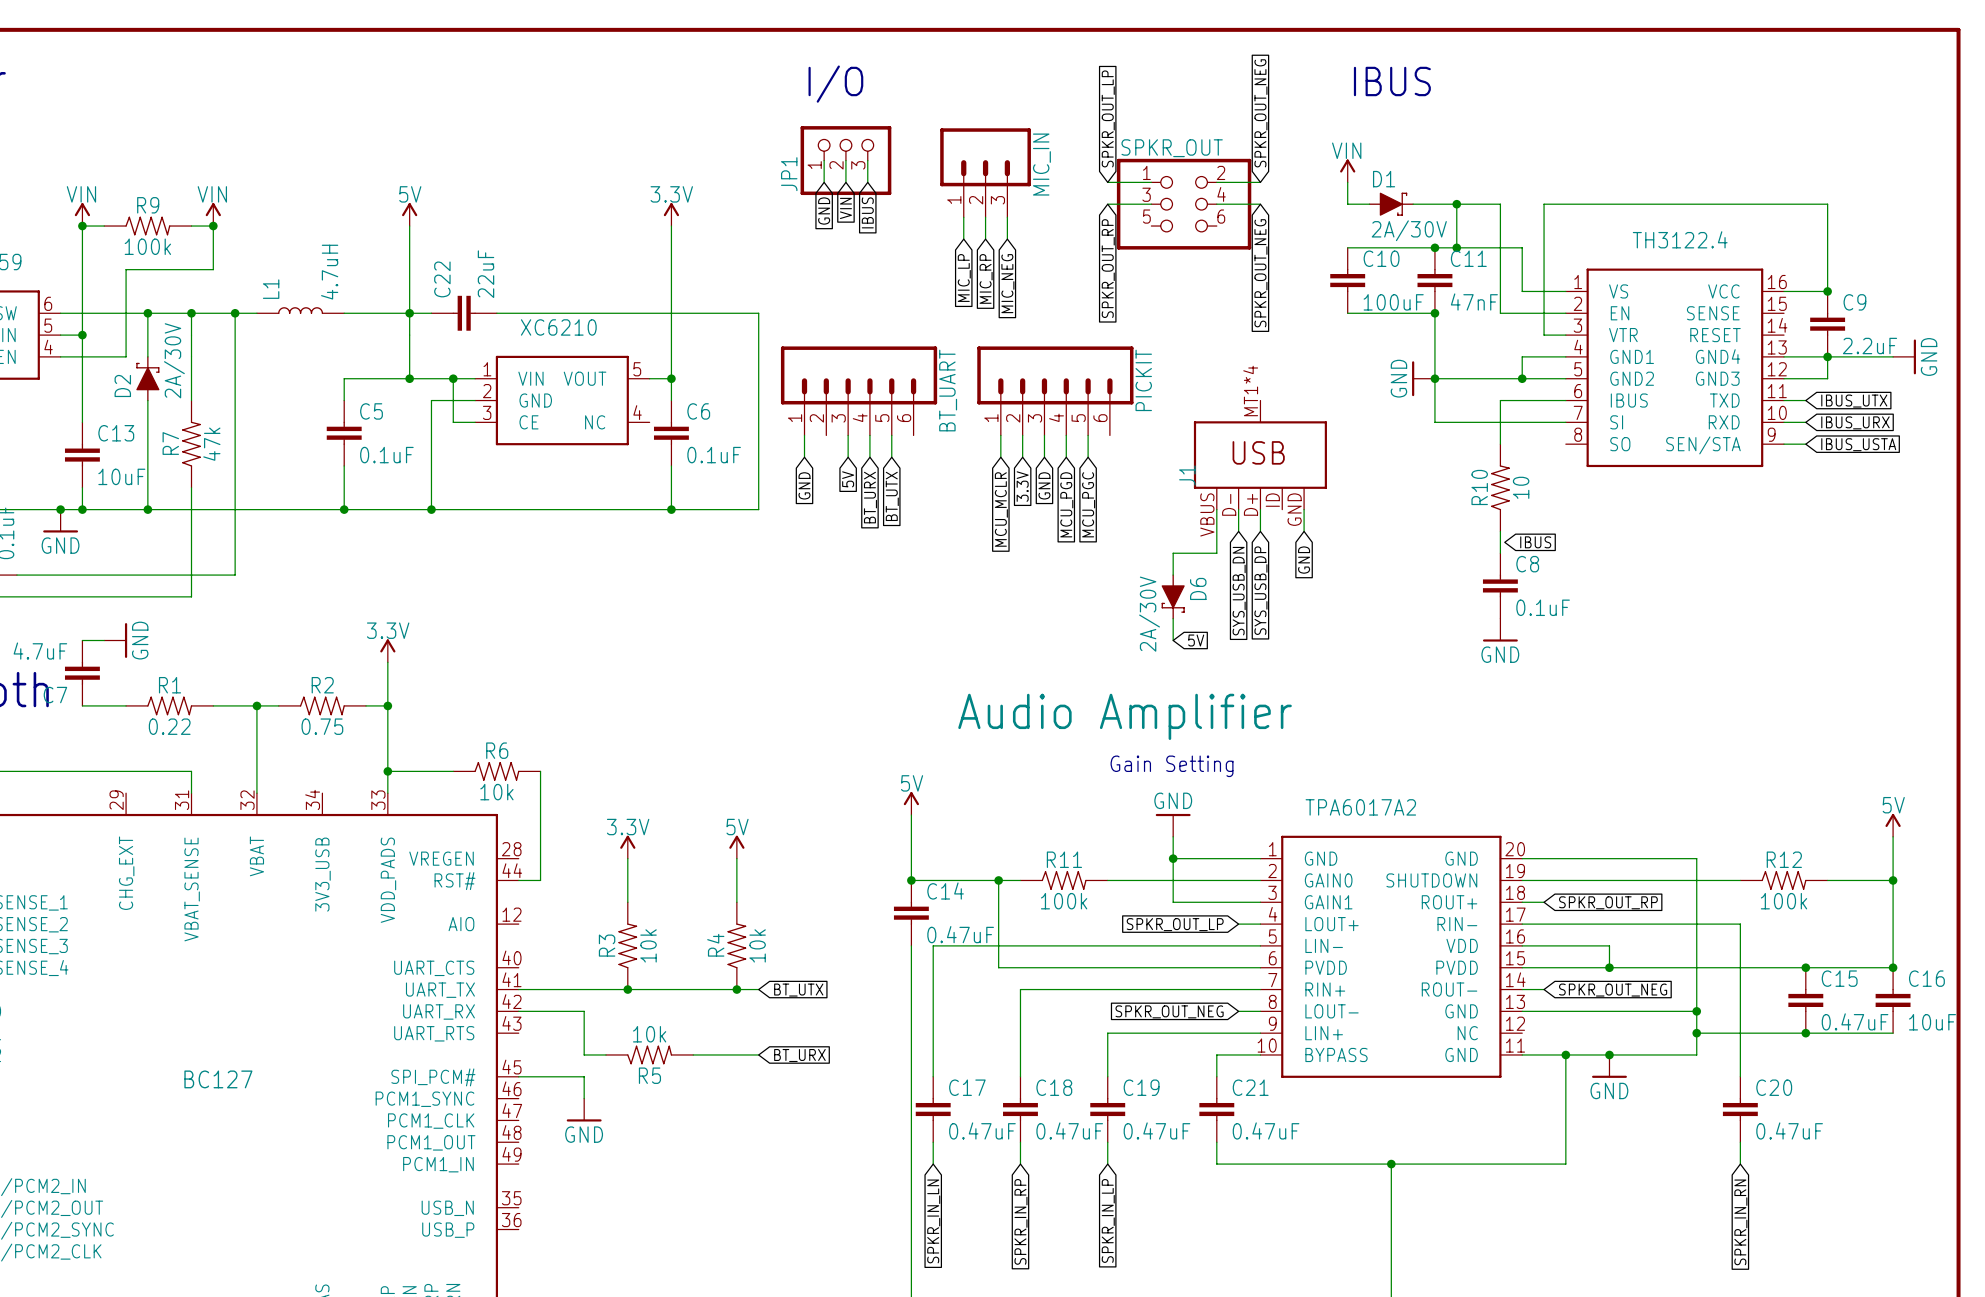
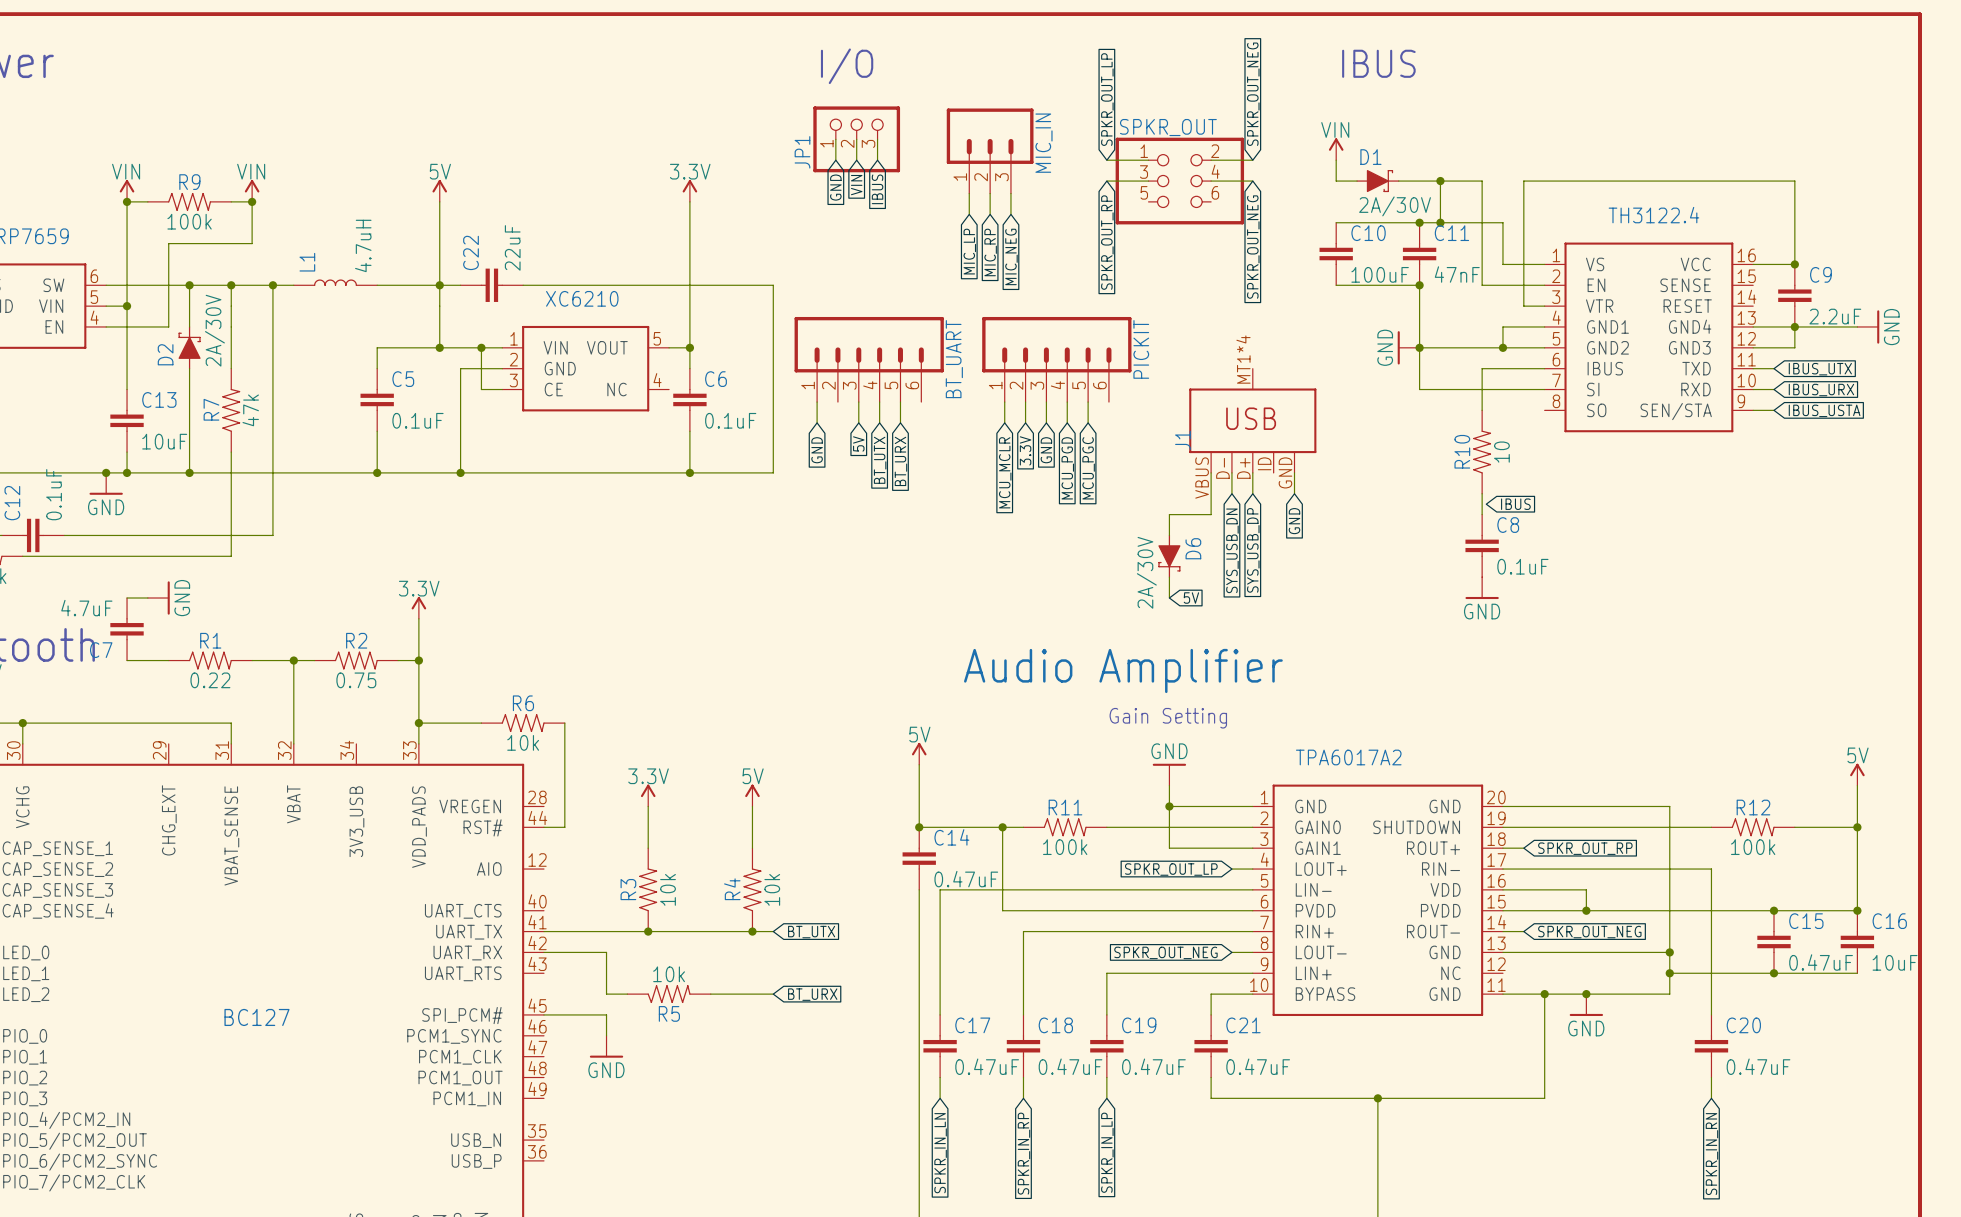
global label: BT_UTX (892, 496) -> BT_URX (900, 461)
global label: BT_URX (870, 497) -> BT_UTX (880, 460)

